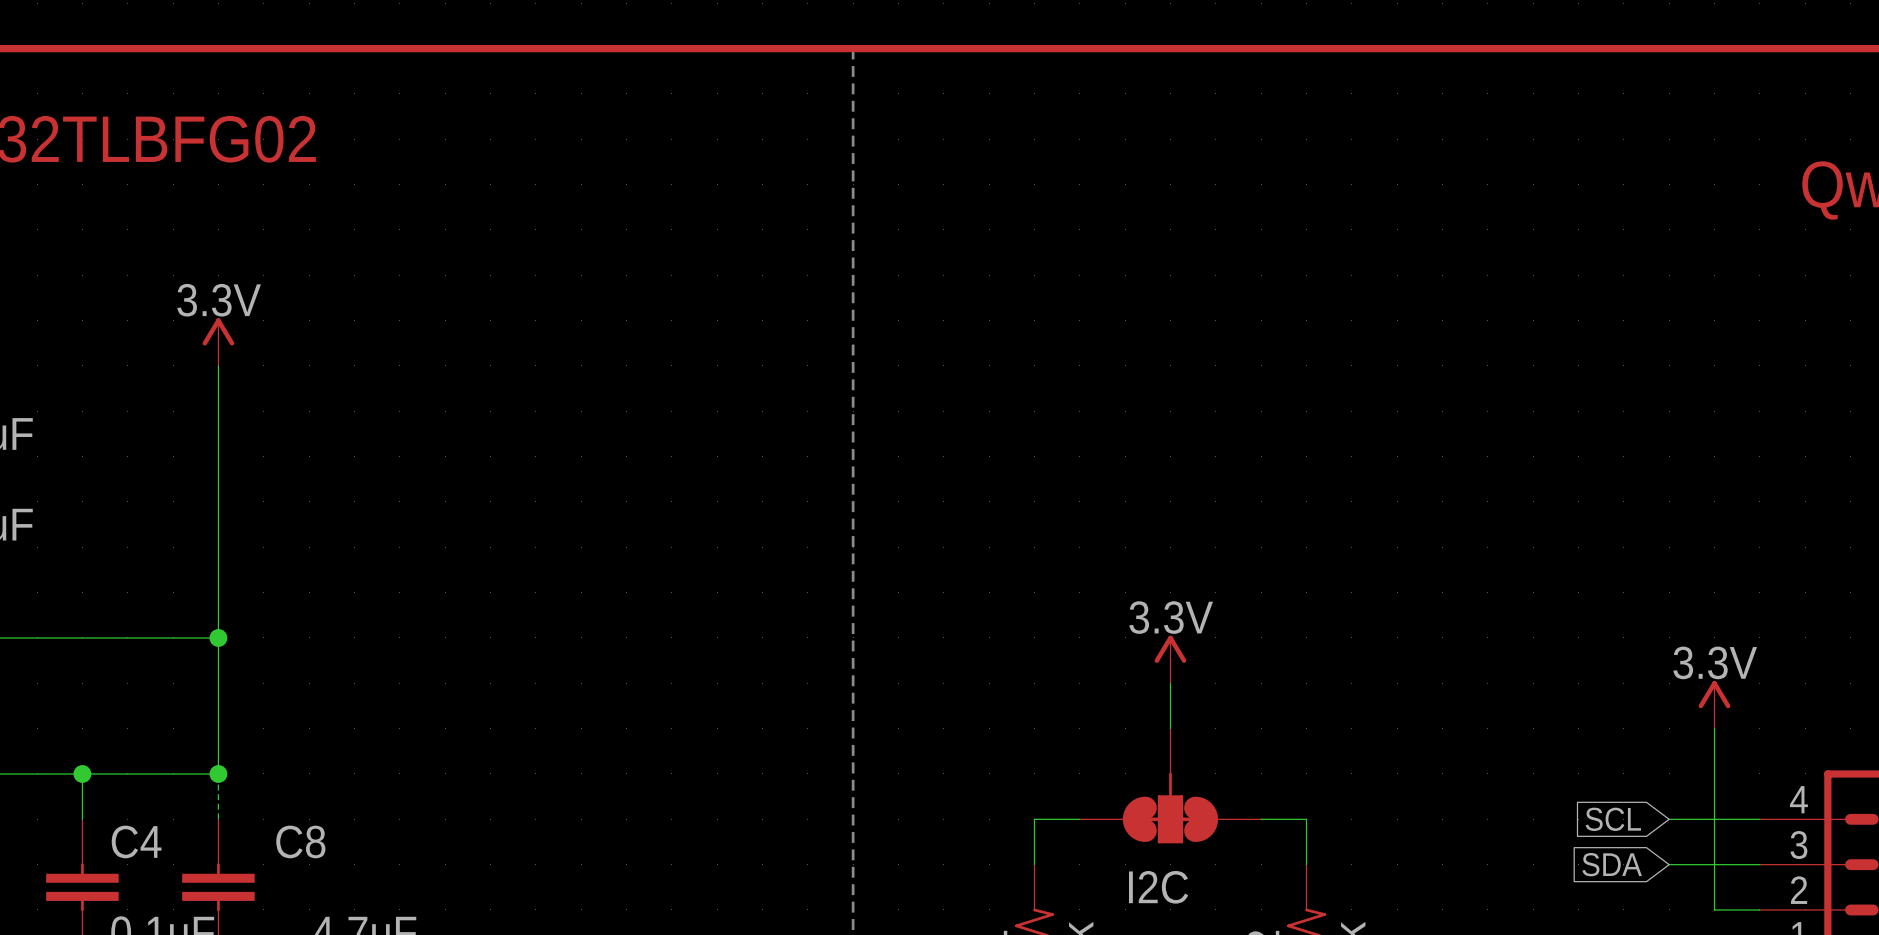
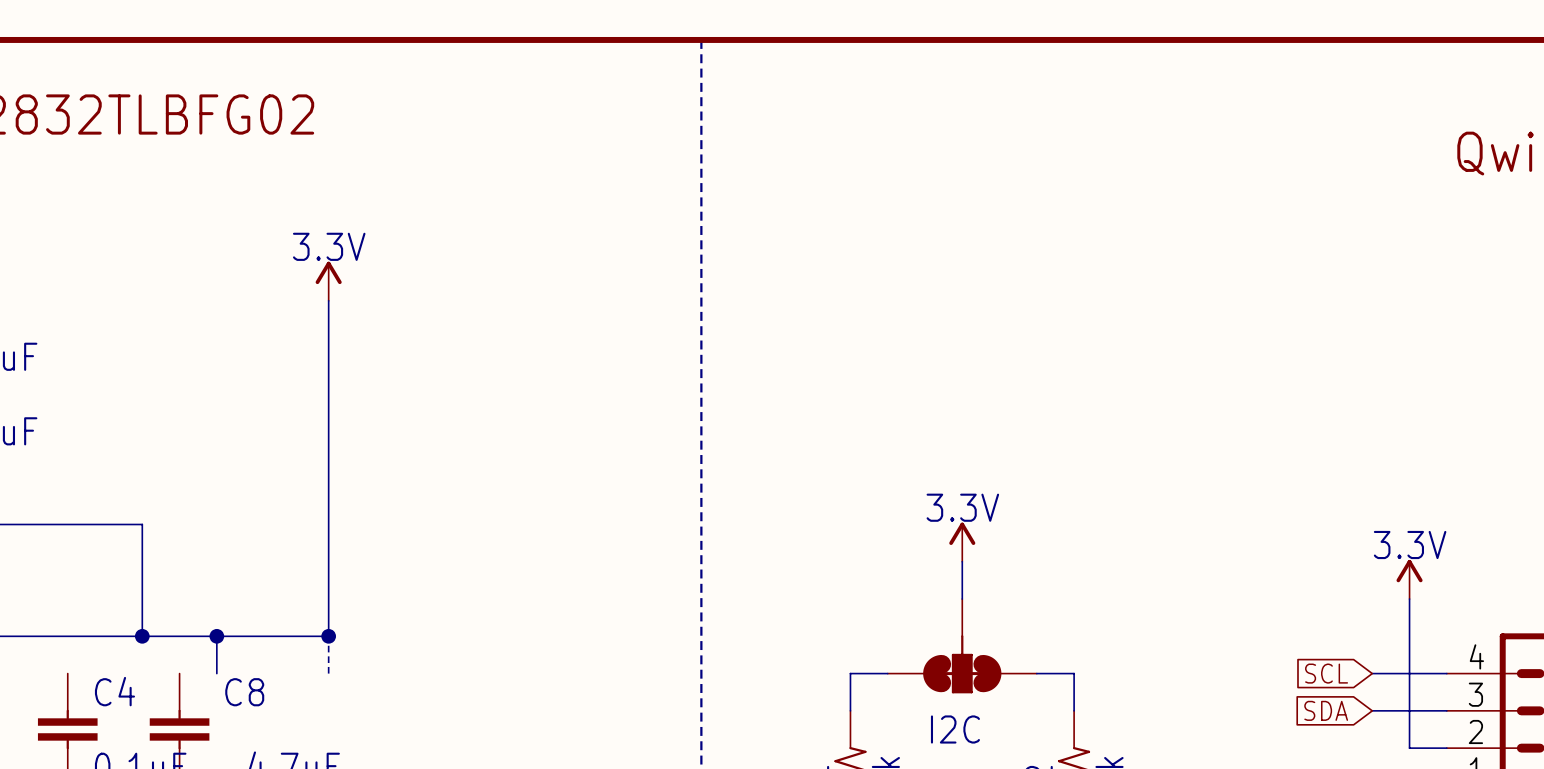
power symbol position: 3.3V (218, 342) -> 3.3V (328, 281)
wire: (218, 365) (218, 819) -> none
wire: none -> (328, 300) (328, 636)
wire: (173, 637) (218, 637) -> (142, 524) (142, 636)
junction: (218, 637) -> none
wire: (82, 773) (82, 819) -> (216, 636) (216, 673)
junction: (82, 773) -> none
junction: none -> (142, 636)
wire: none -> (179, 636) (328, 636)
junction: (218, 773) -> none
junction: none -> (216, 636)
wire: none -> (328, 636) (328, 673)
junction: none -> (328, 636)

